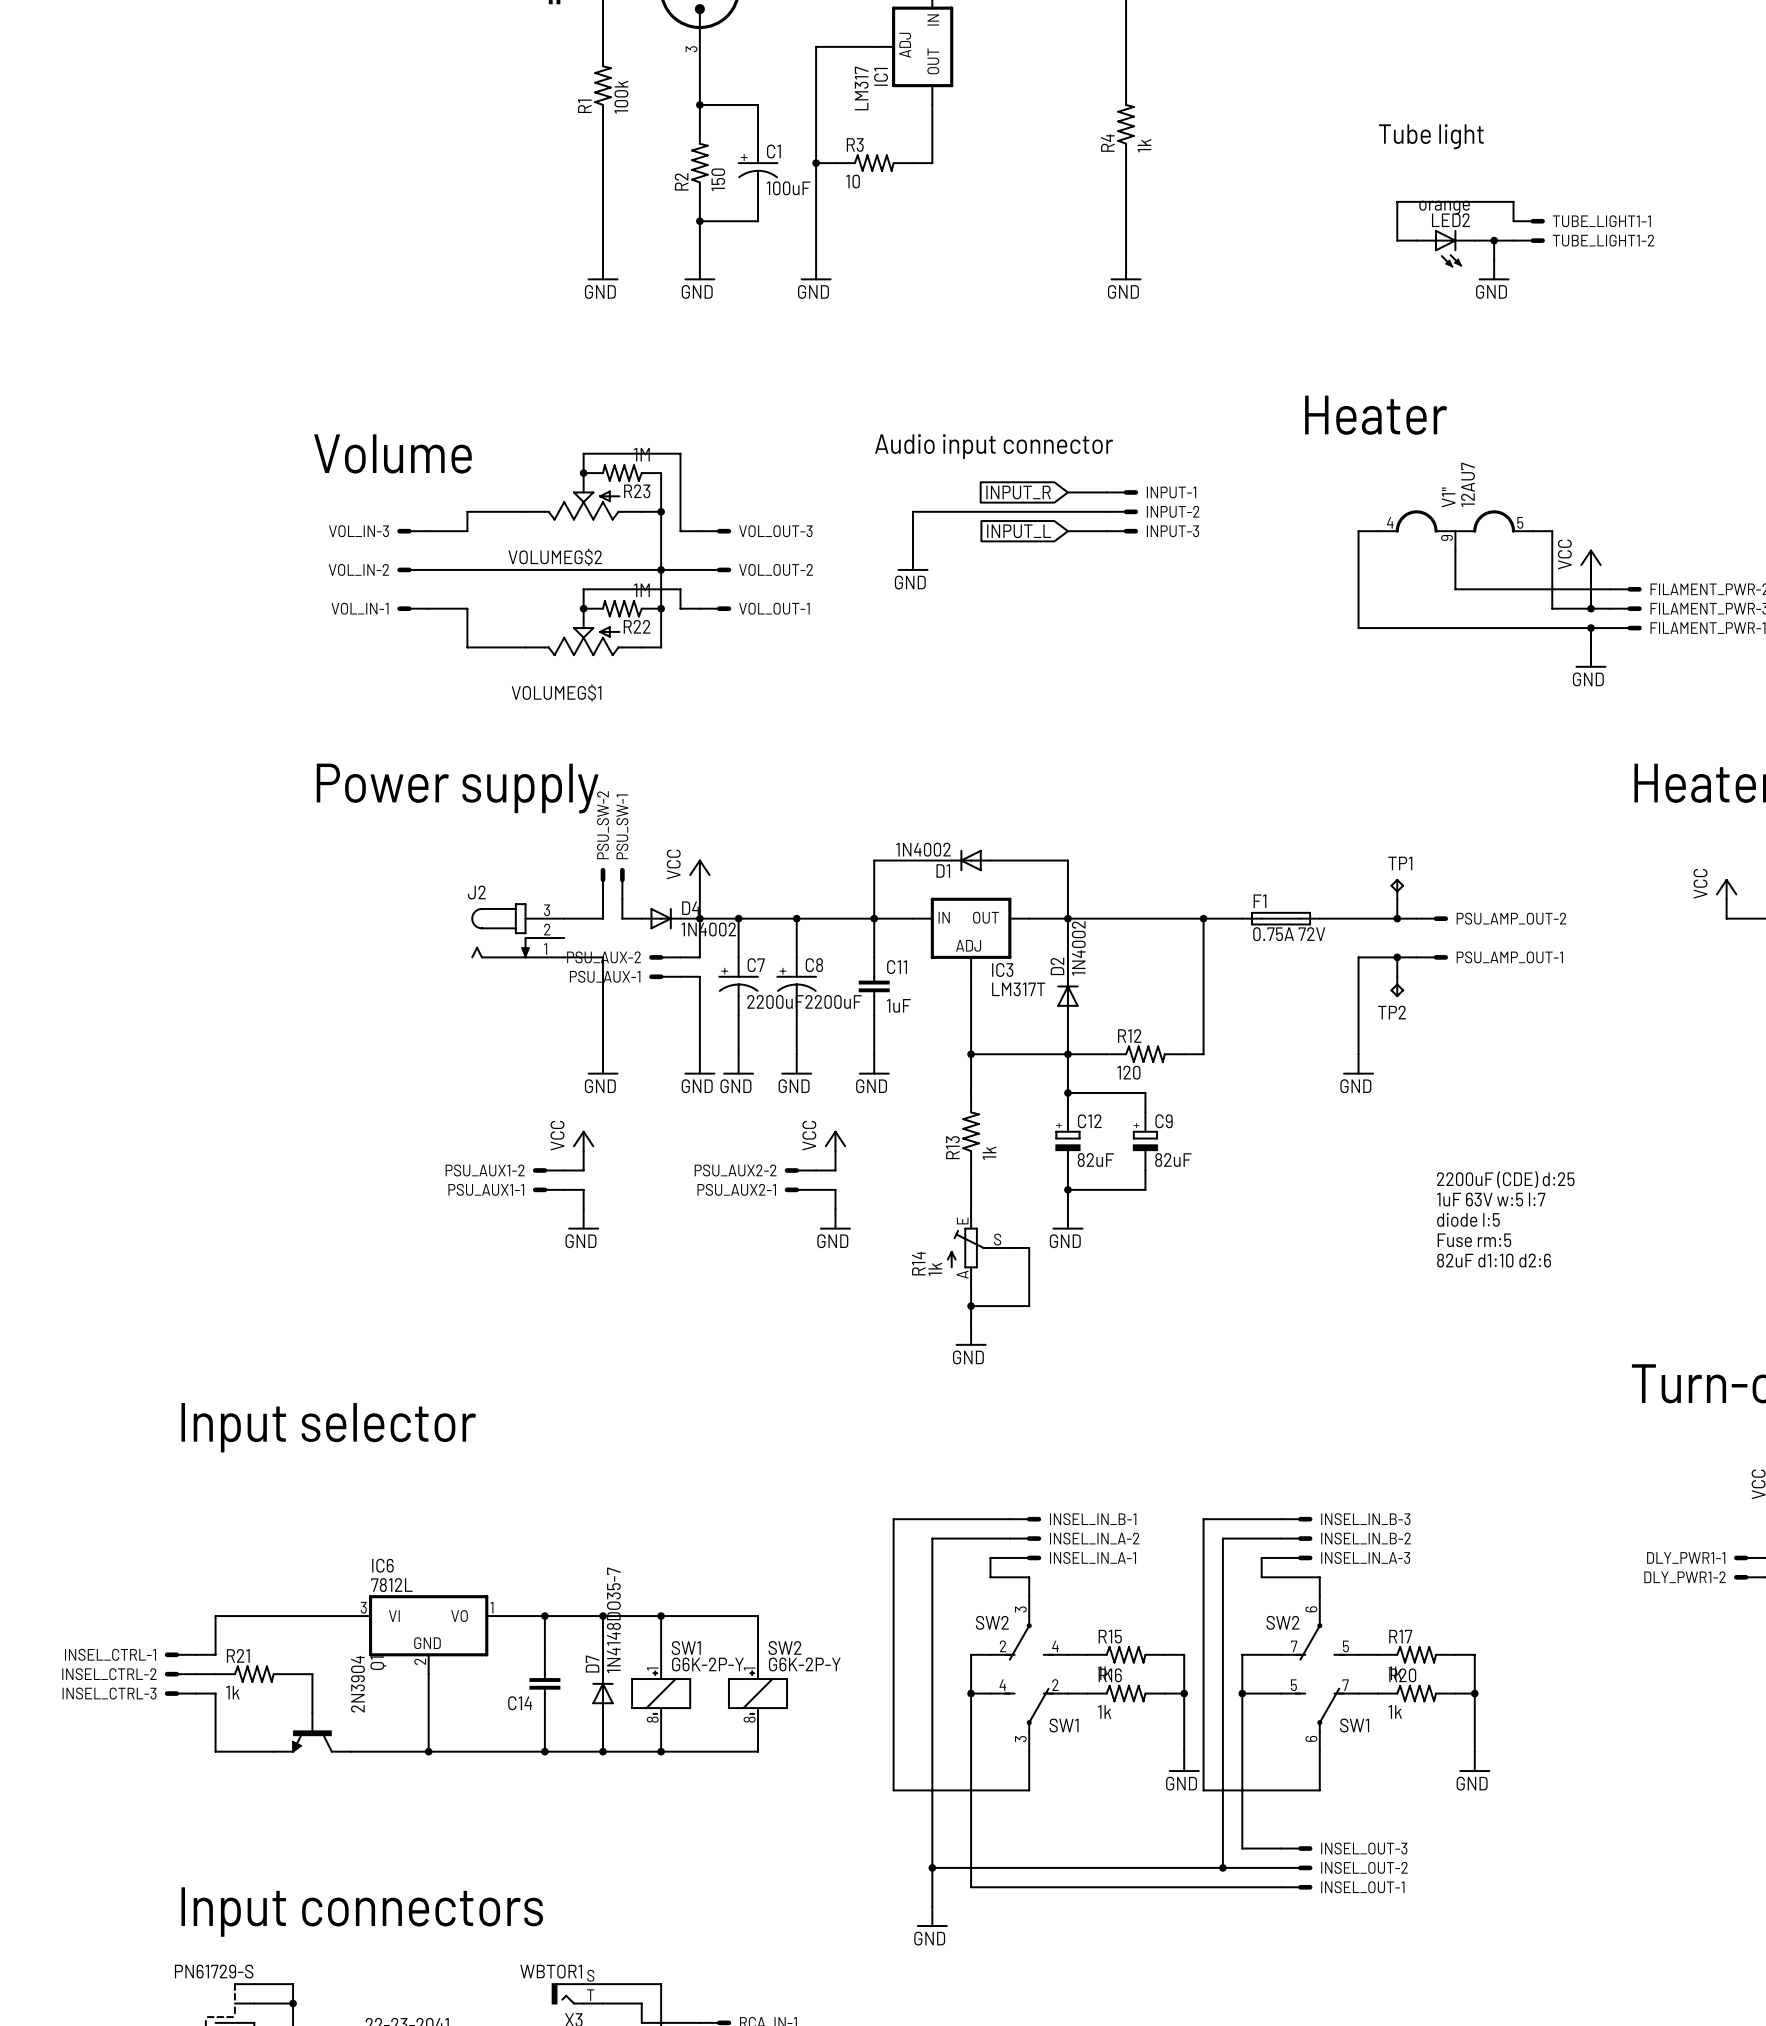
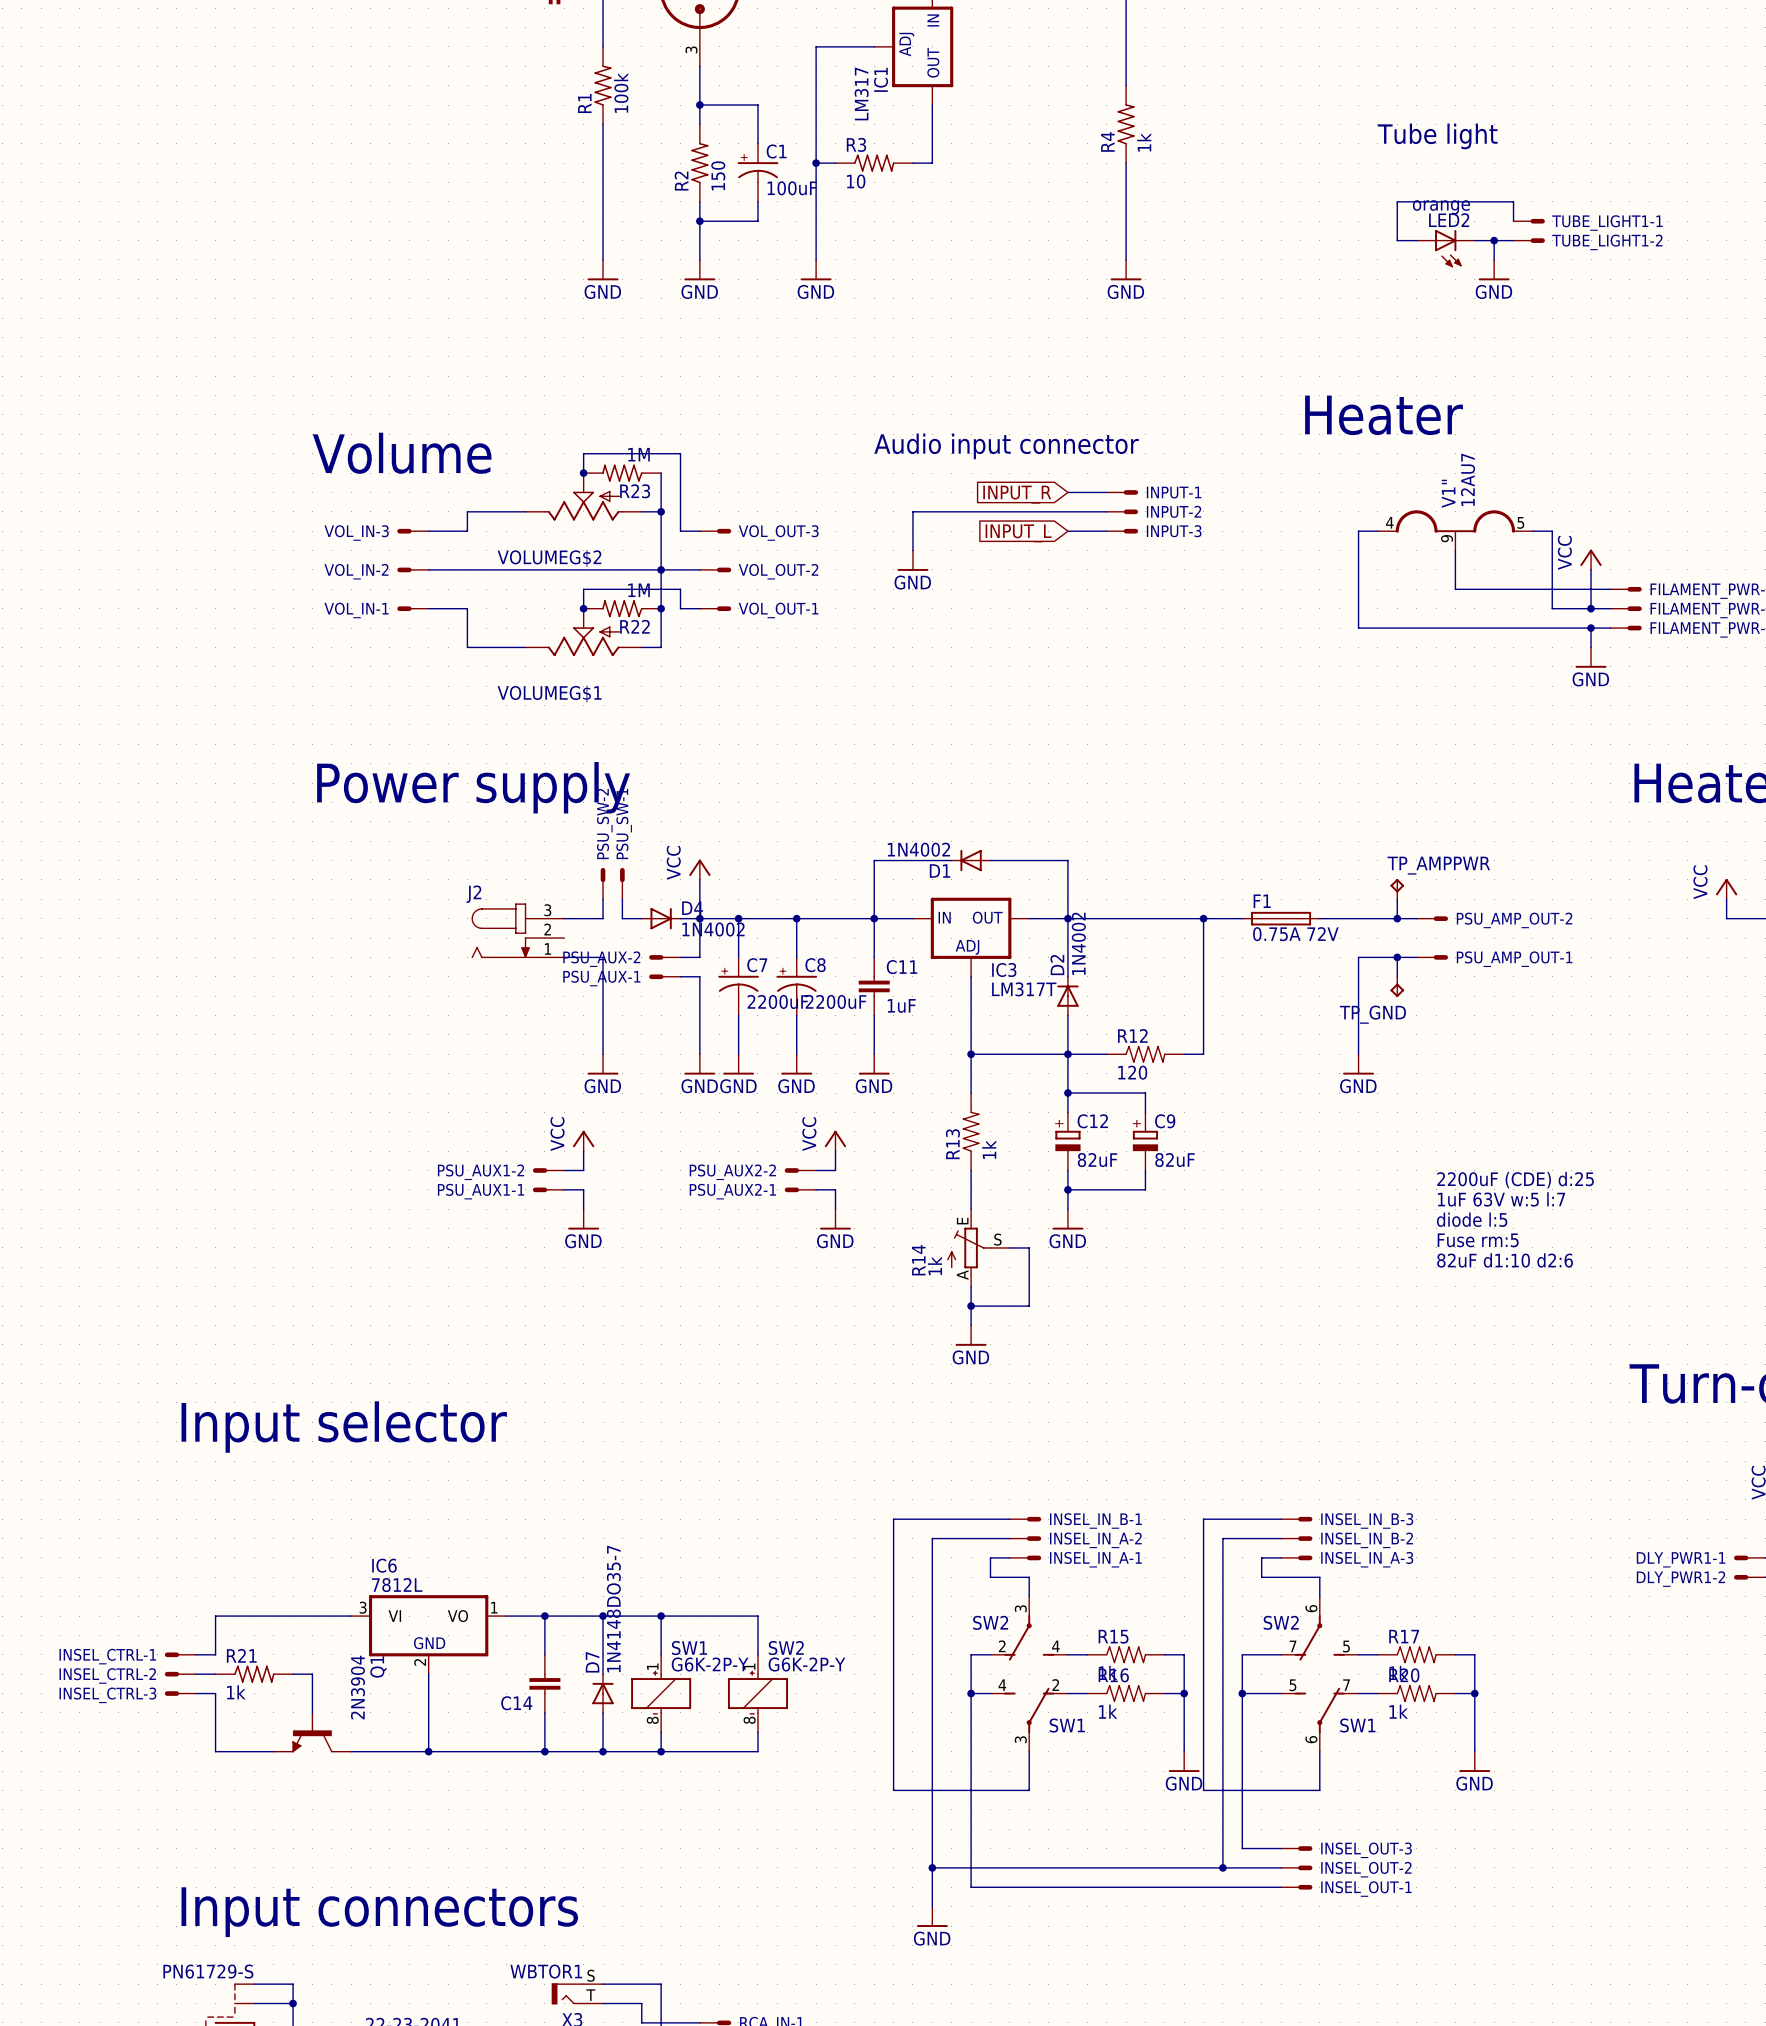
TP1 name: TP1 (1400, 863) -> TP_AMPPWR (1438, 865)
TP2 name: TP2 (1392, 1012) -> TP_GND (1372, 1014)

